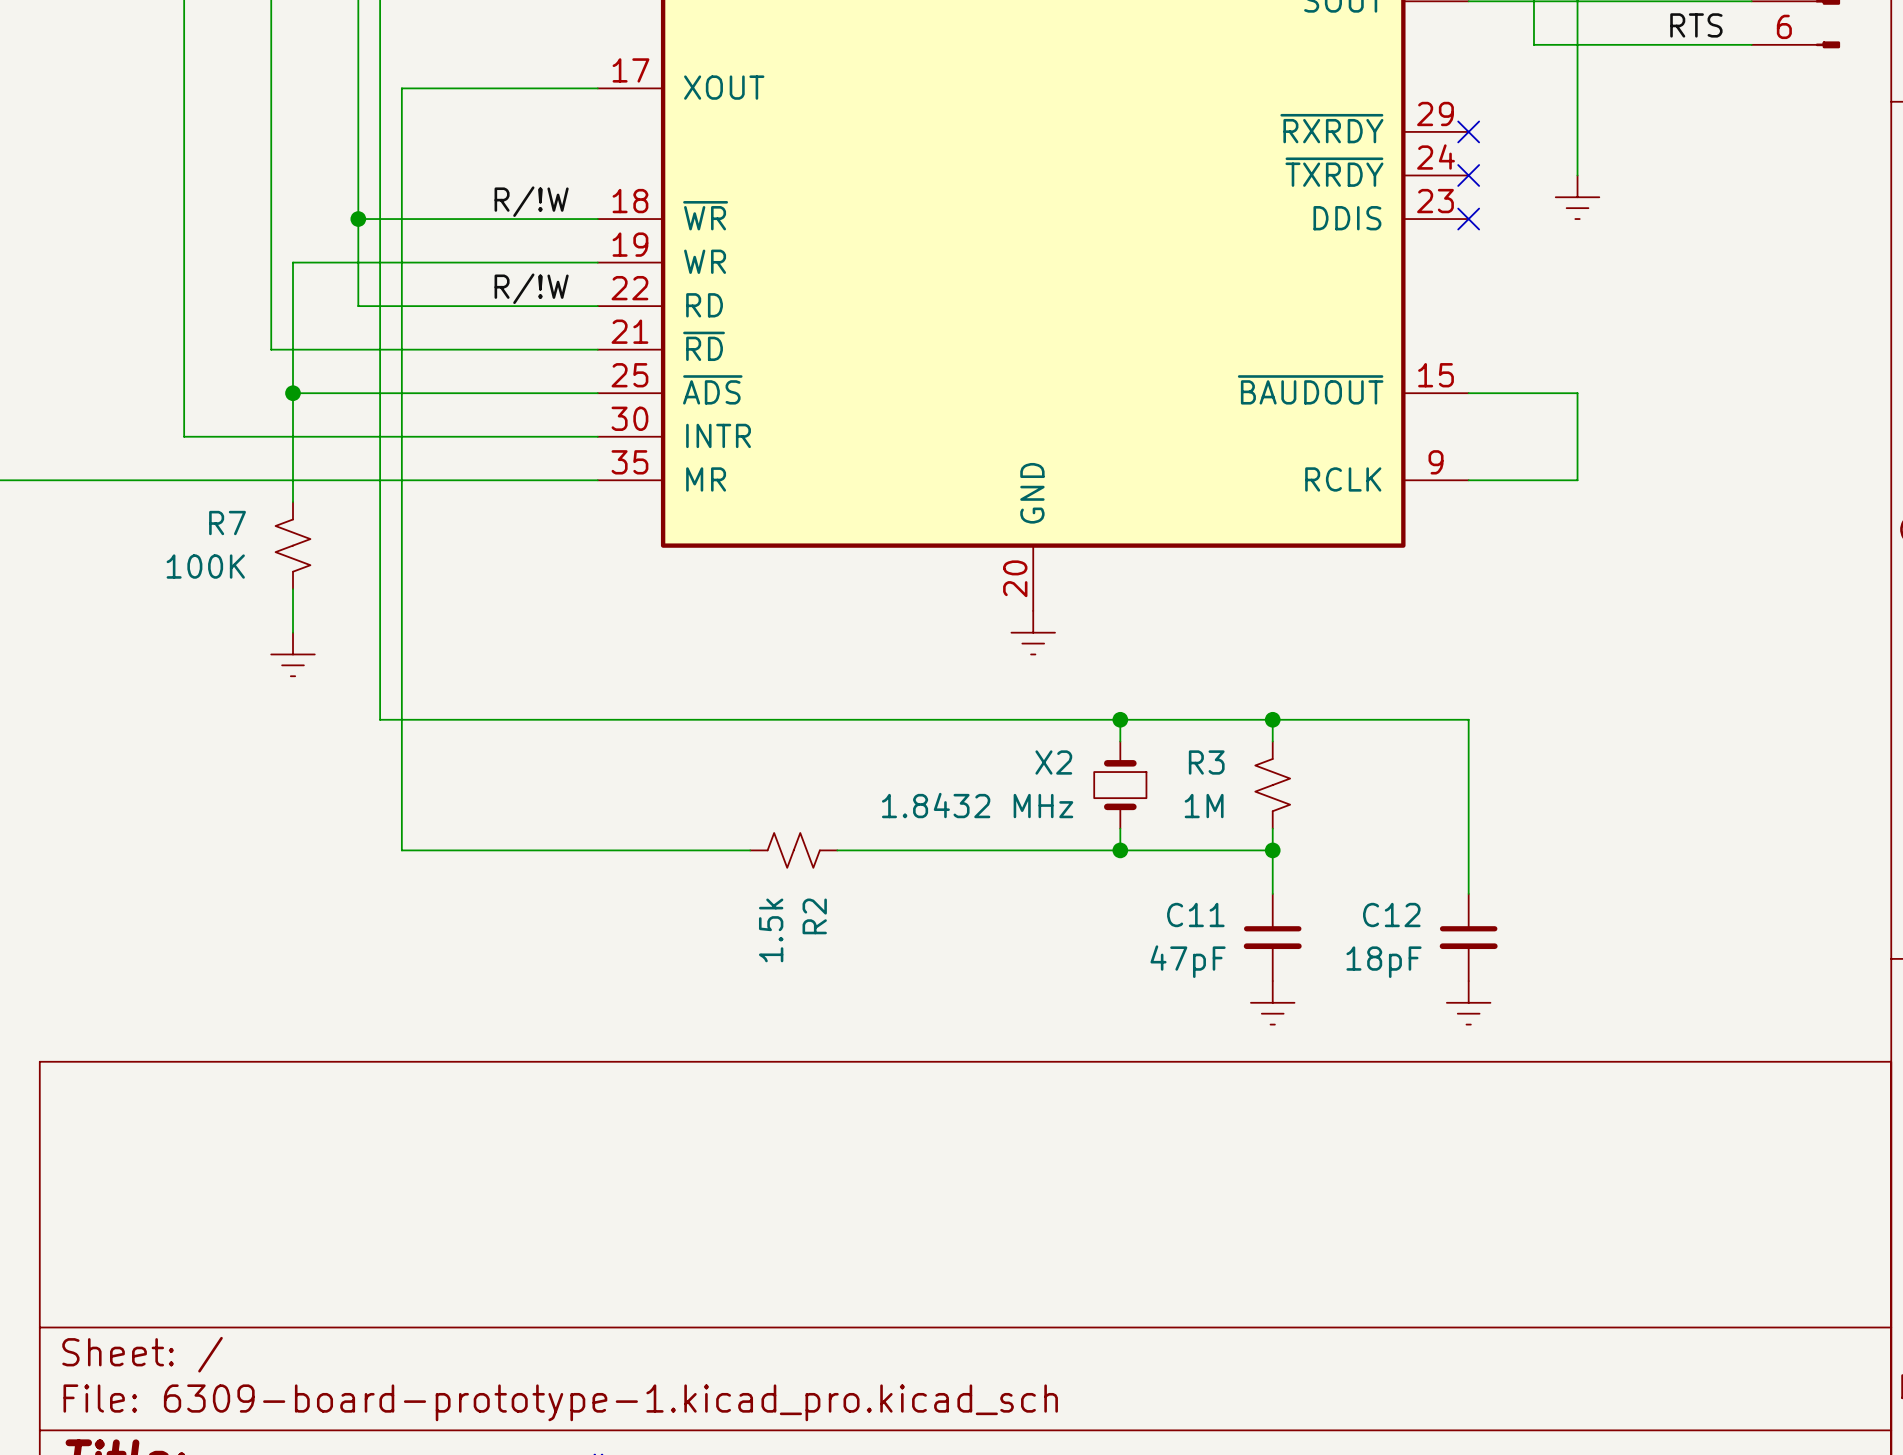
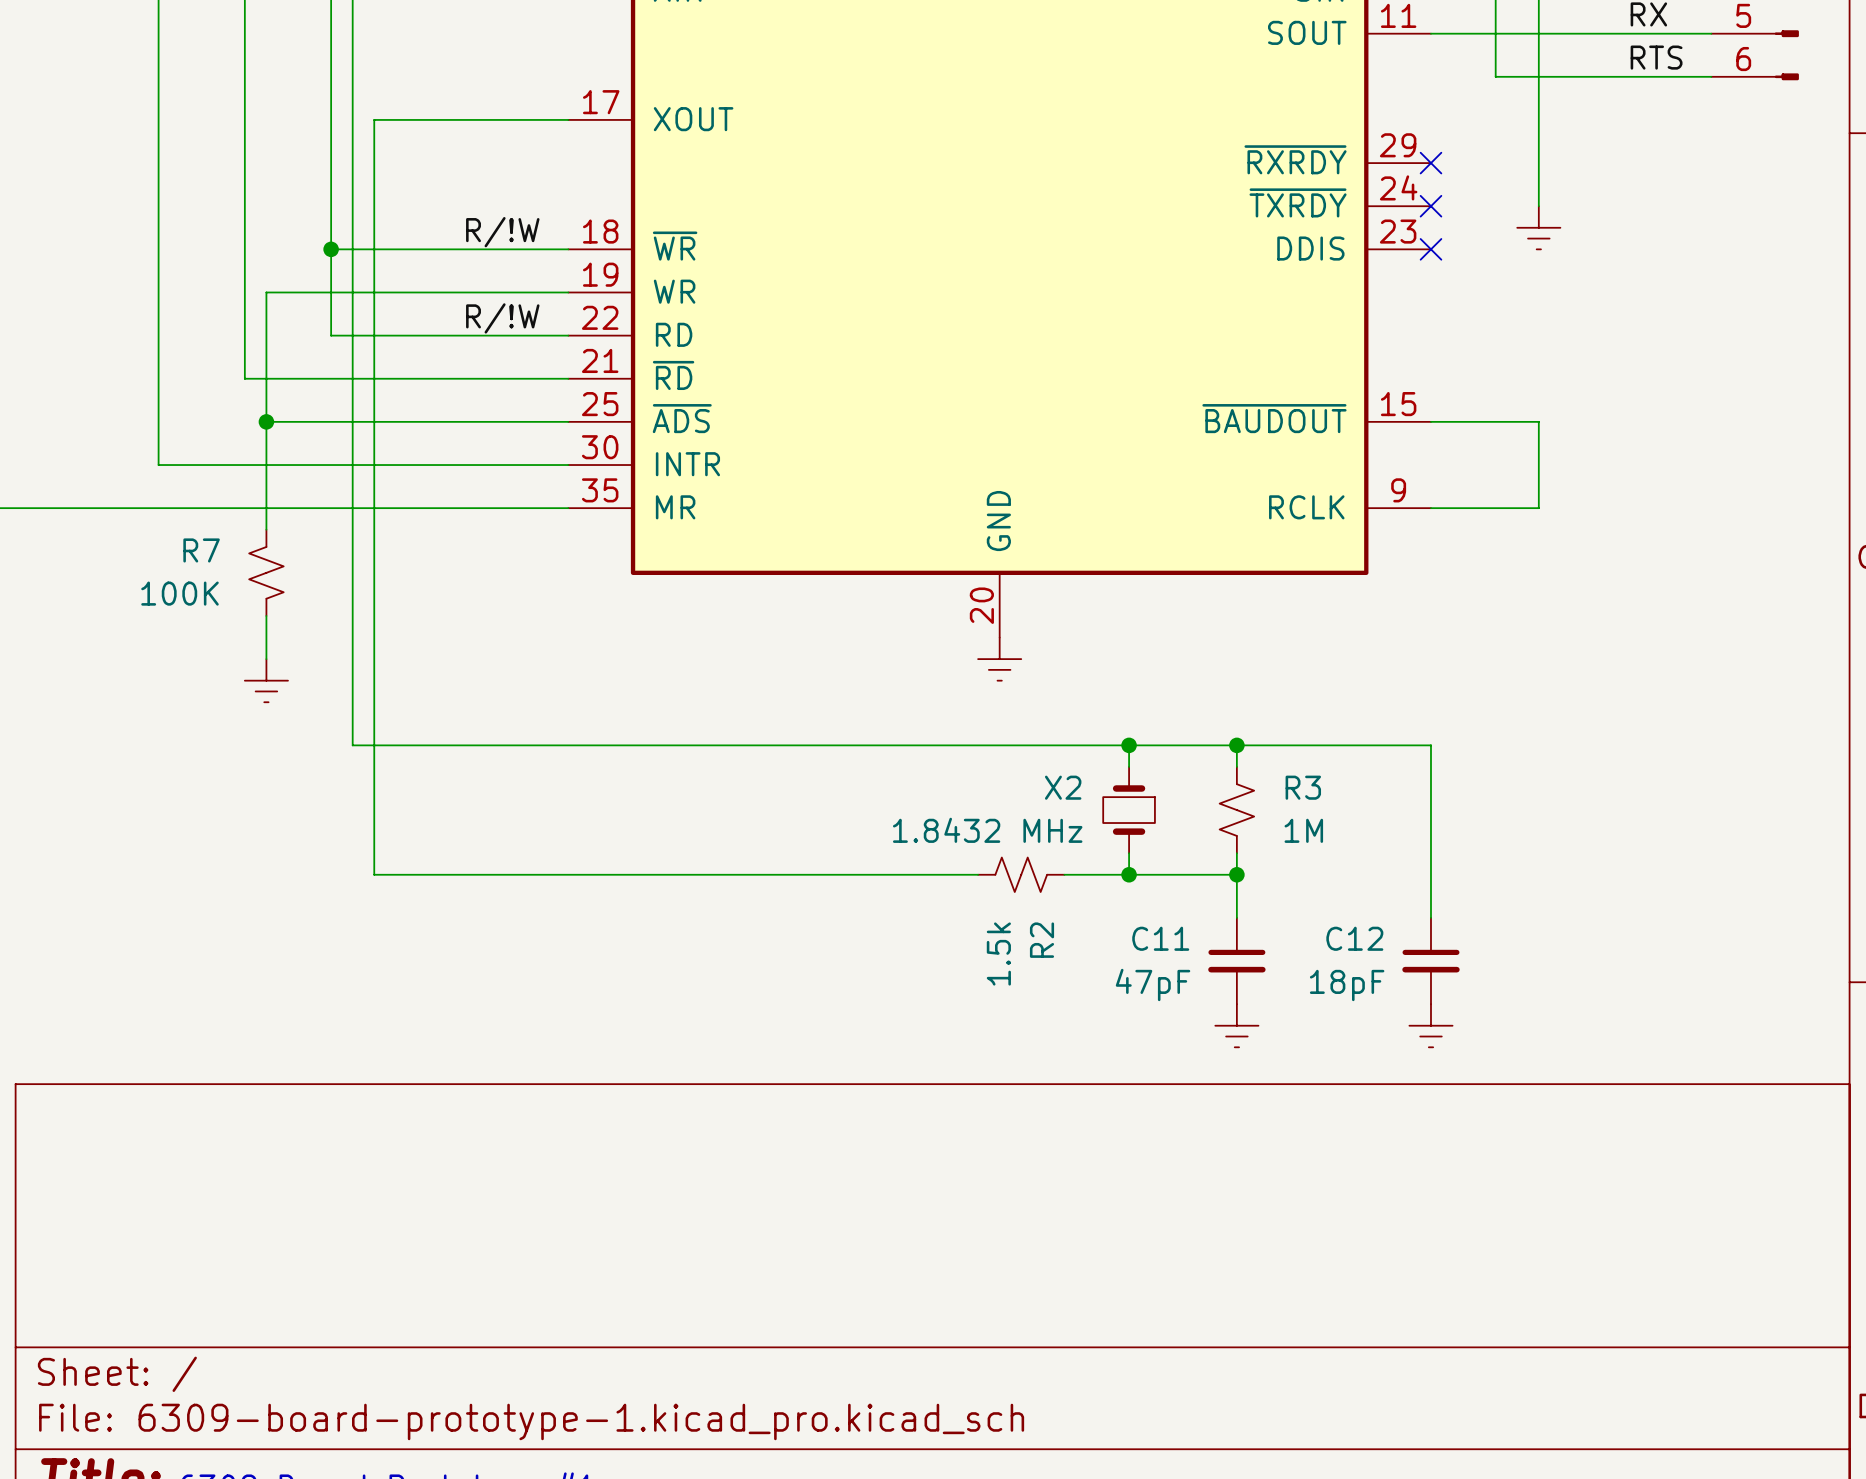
wire: (1120, 719) (1120, 741) -> (1129, 745) (1129, 766)
junction position: (1120, 719) -> (1129, 745)
X2 position: (1120, 785) -> (1129, 810)
R3 flip: as is (1272, 785) -> left-right (1236, 810)
wire: (1120, 828) (1120, 850) -> (1129, 853) (1129, 874)
R2 position: (793, 850) -> (1021, 874)
wire: (1011, 850) (1098, 850) -> (719, 874) (805, 874)
junction position: (1120, 850) -> (1129, 874)

